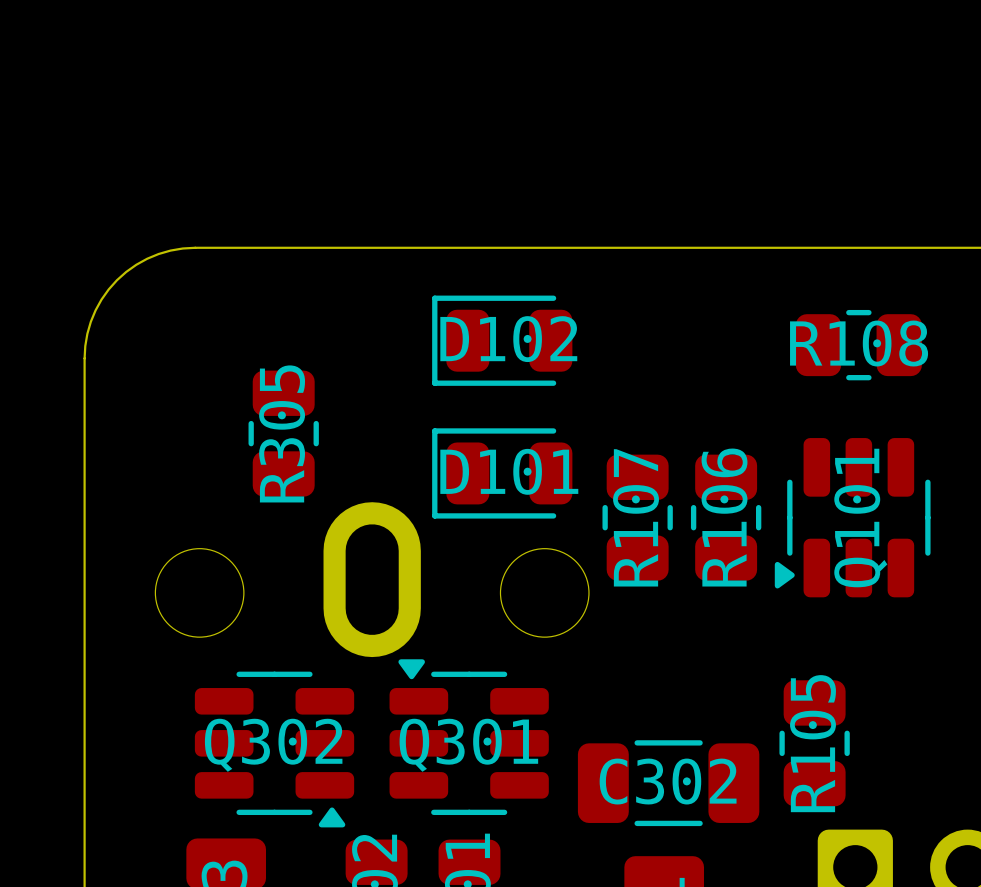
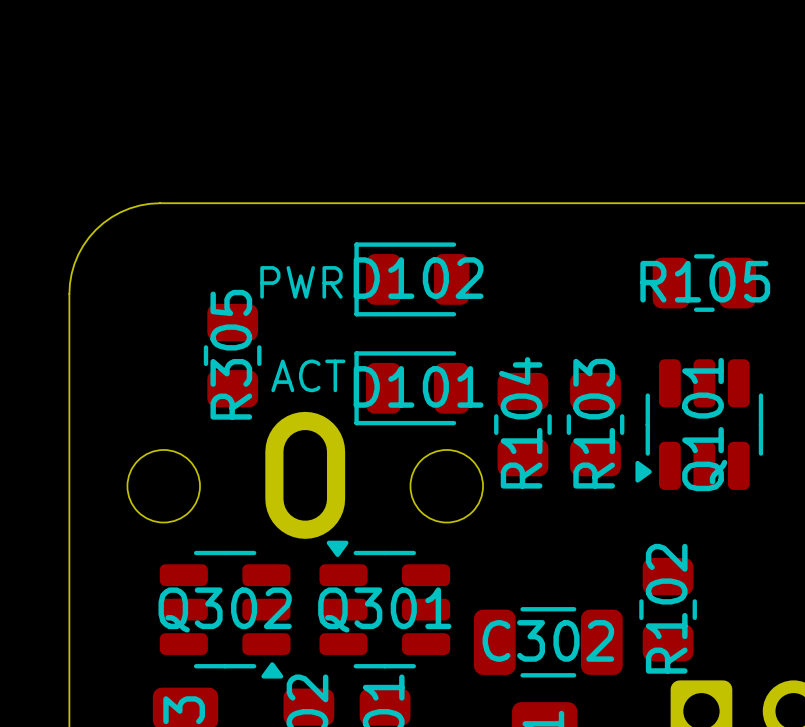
R108 name: R108 (859, 343) -> R105 (705, 281)
text: none -> PWR (301, 282)
text: none -> ACT (308, 375)
R107 name: R107 (636, 517) -> R104 (520, 422)
R106 name: R106 (724, 517) -> R103 (594, 423)
R105 name: R105 (813, 743) -> R102 (666, 608)

